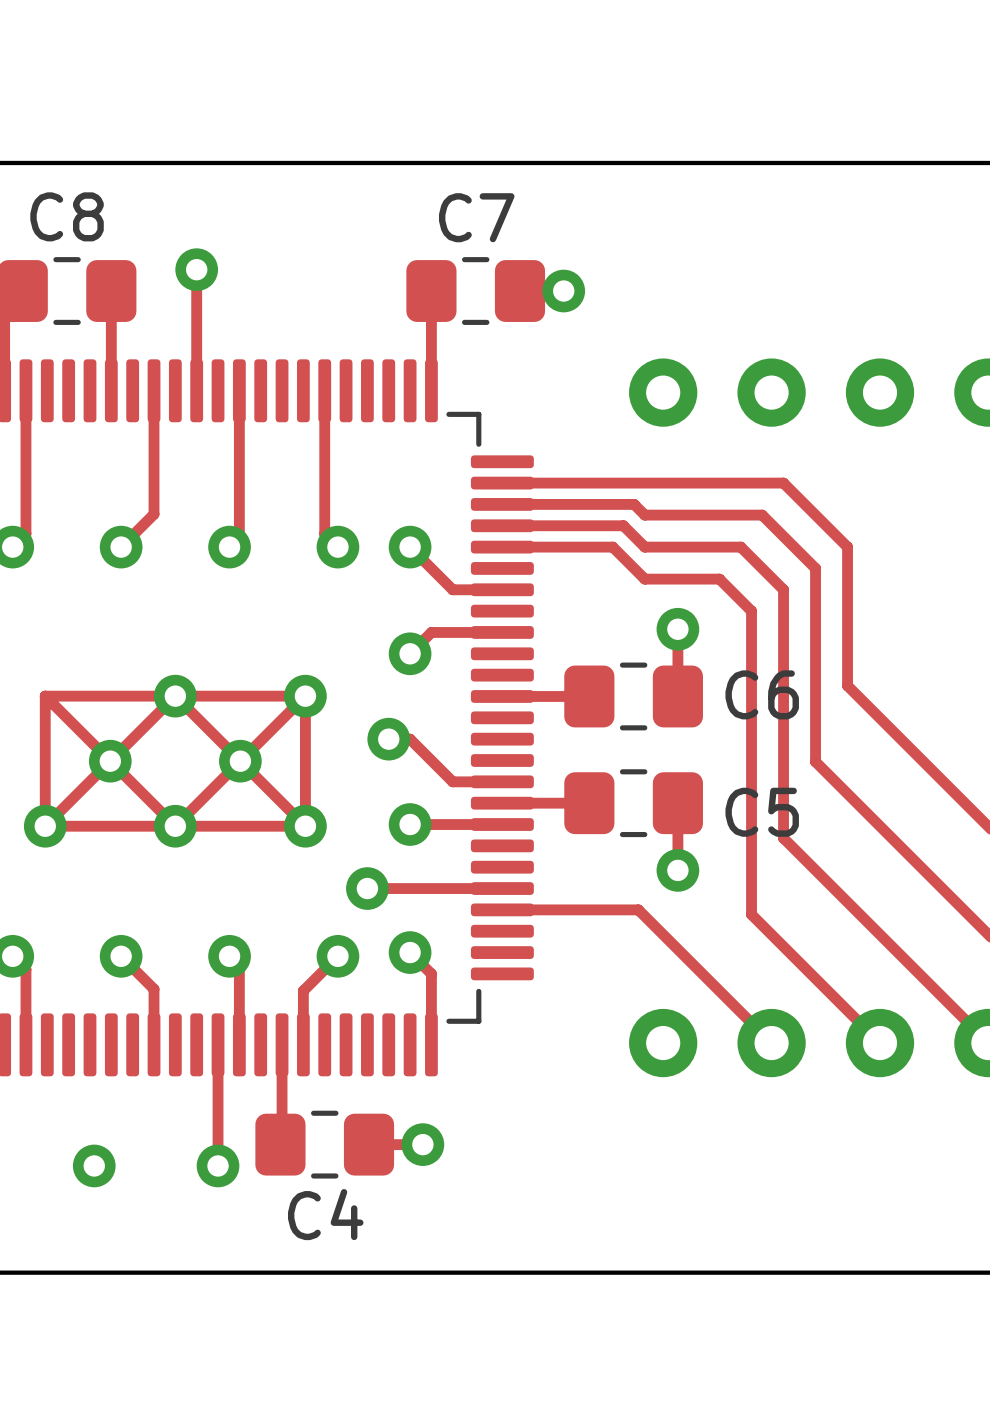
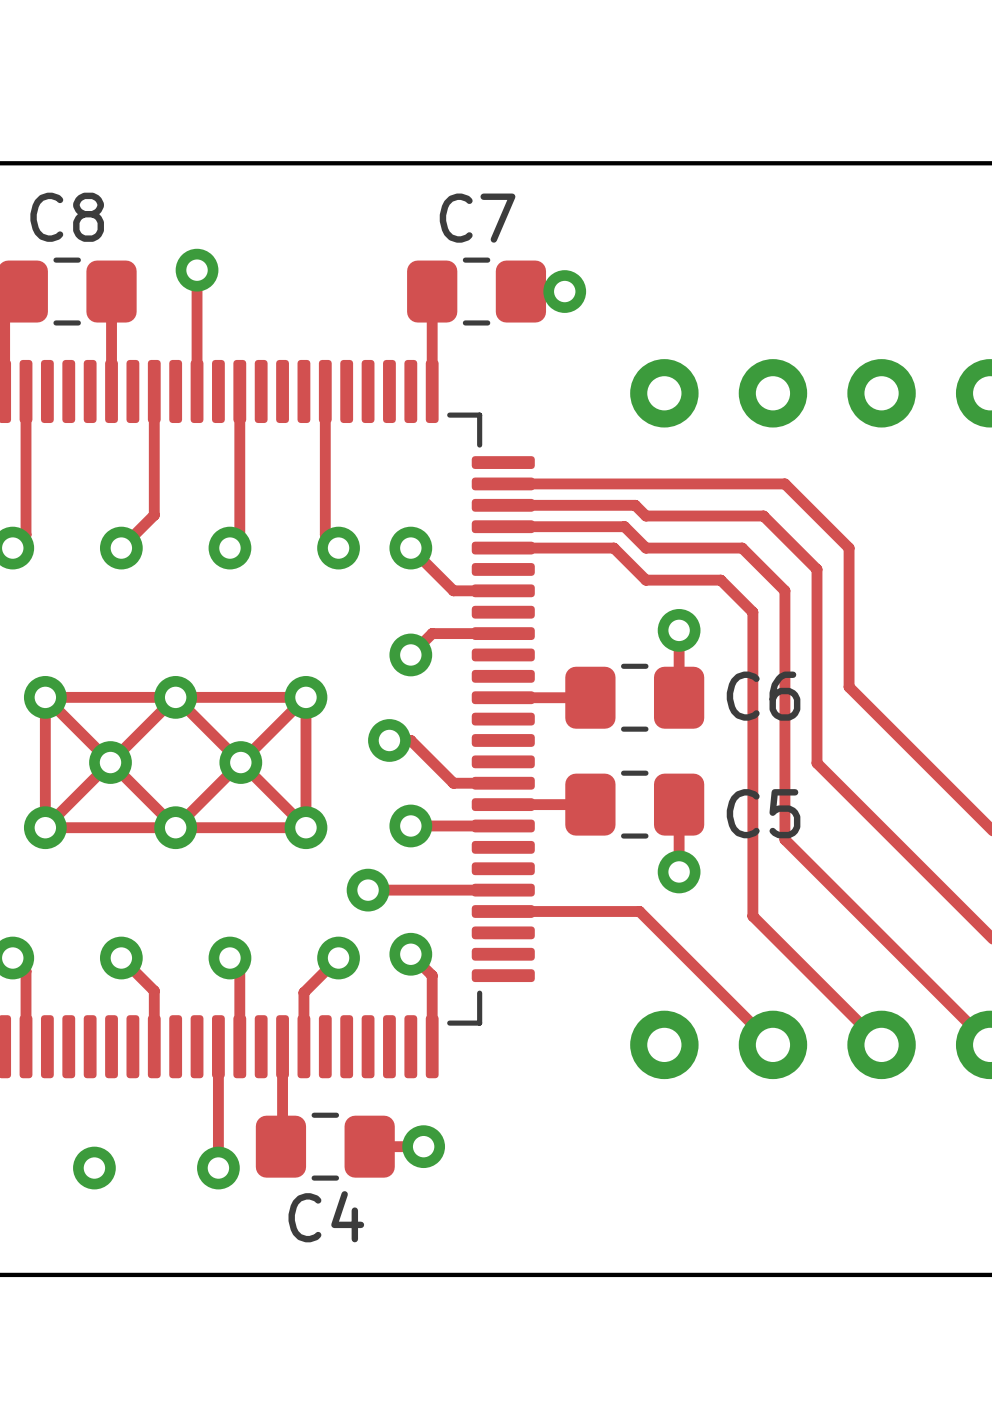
via: none -> (45, 697)

